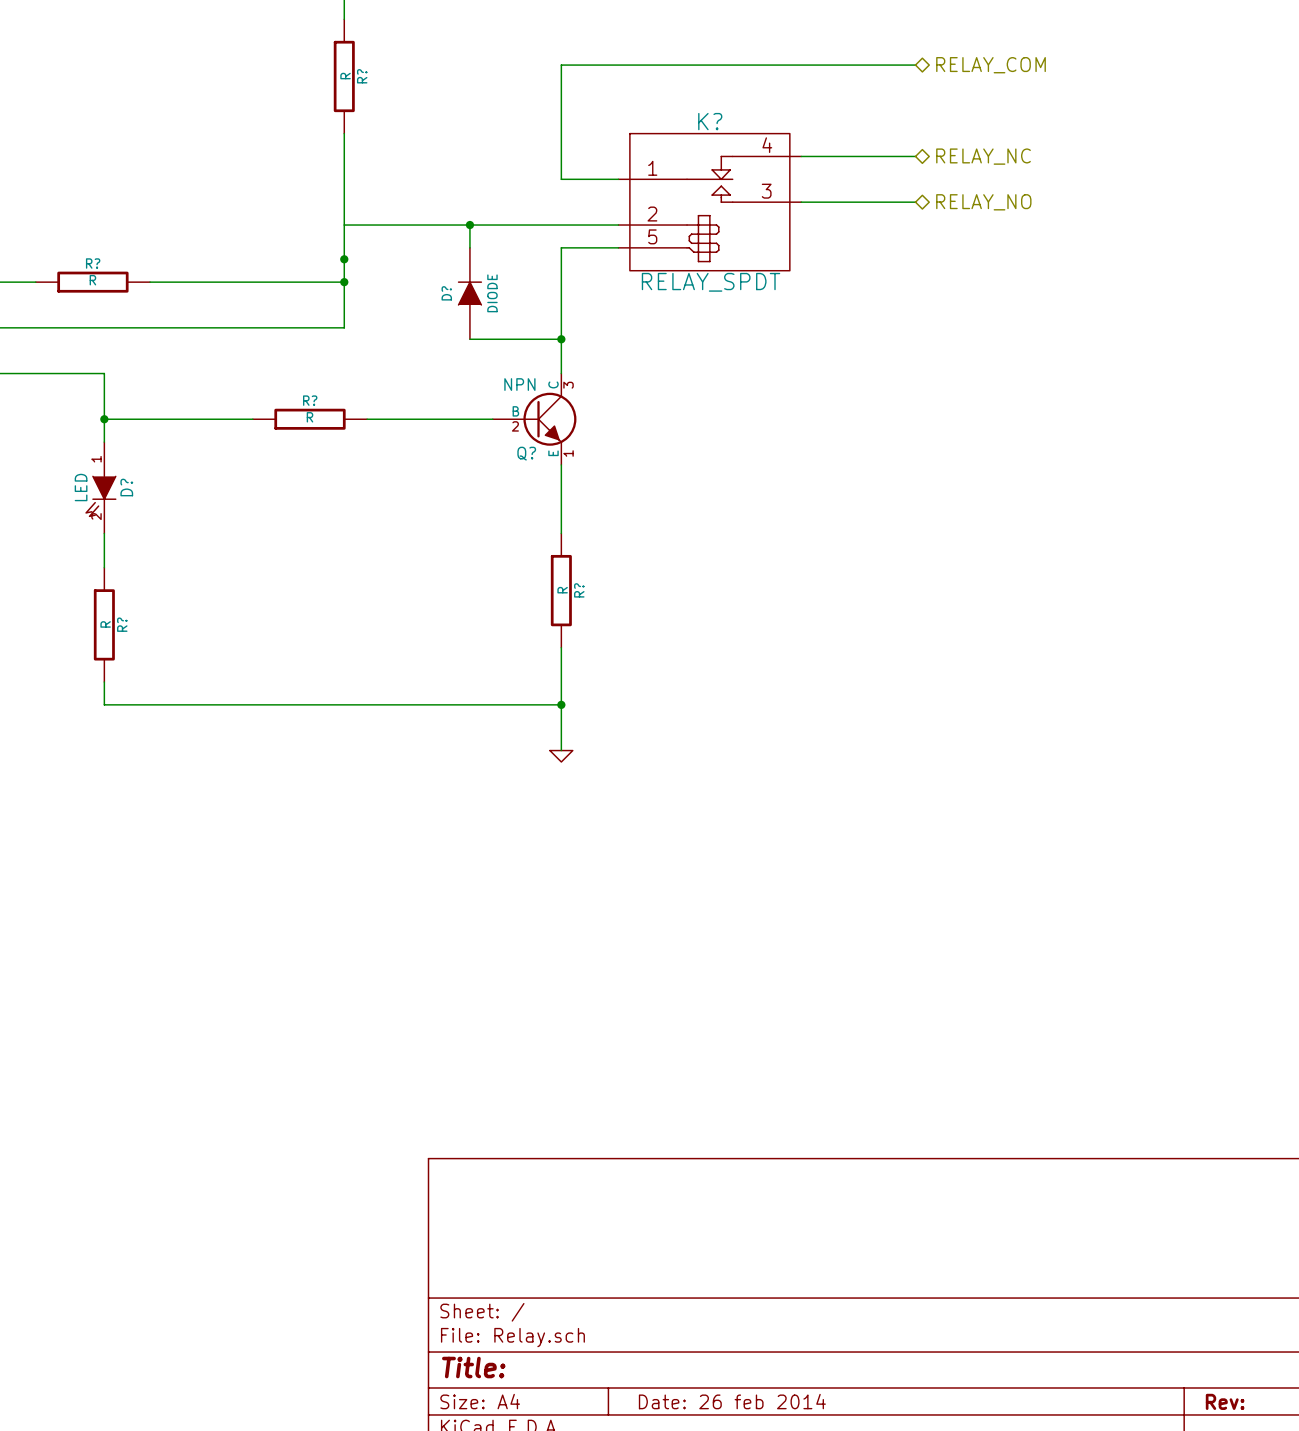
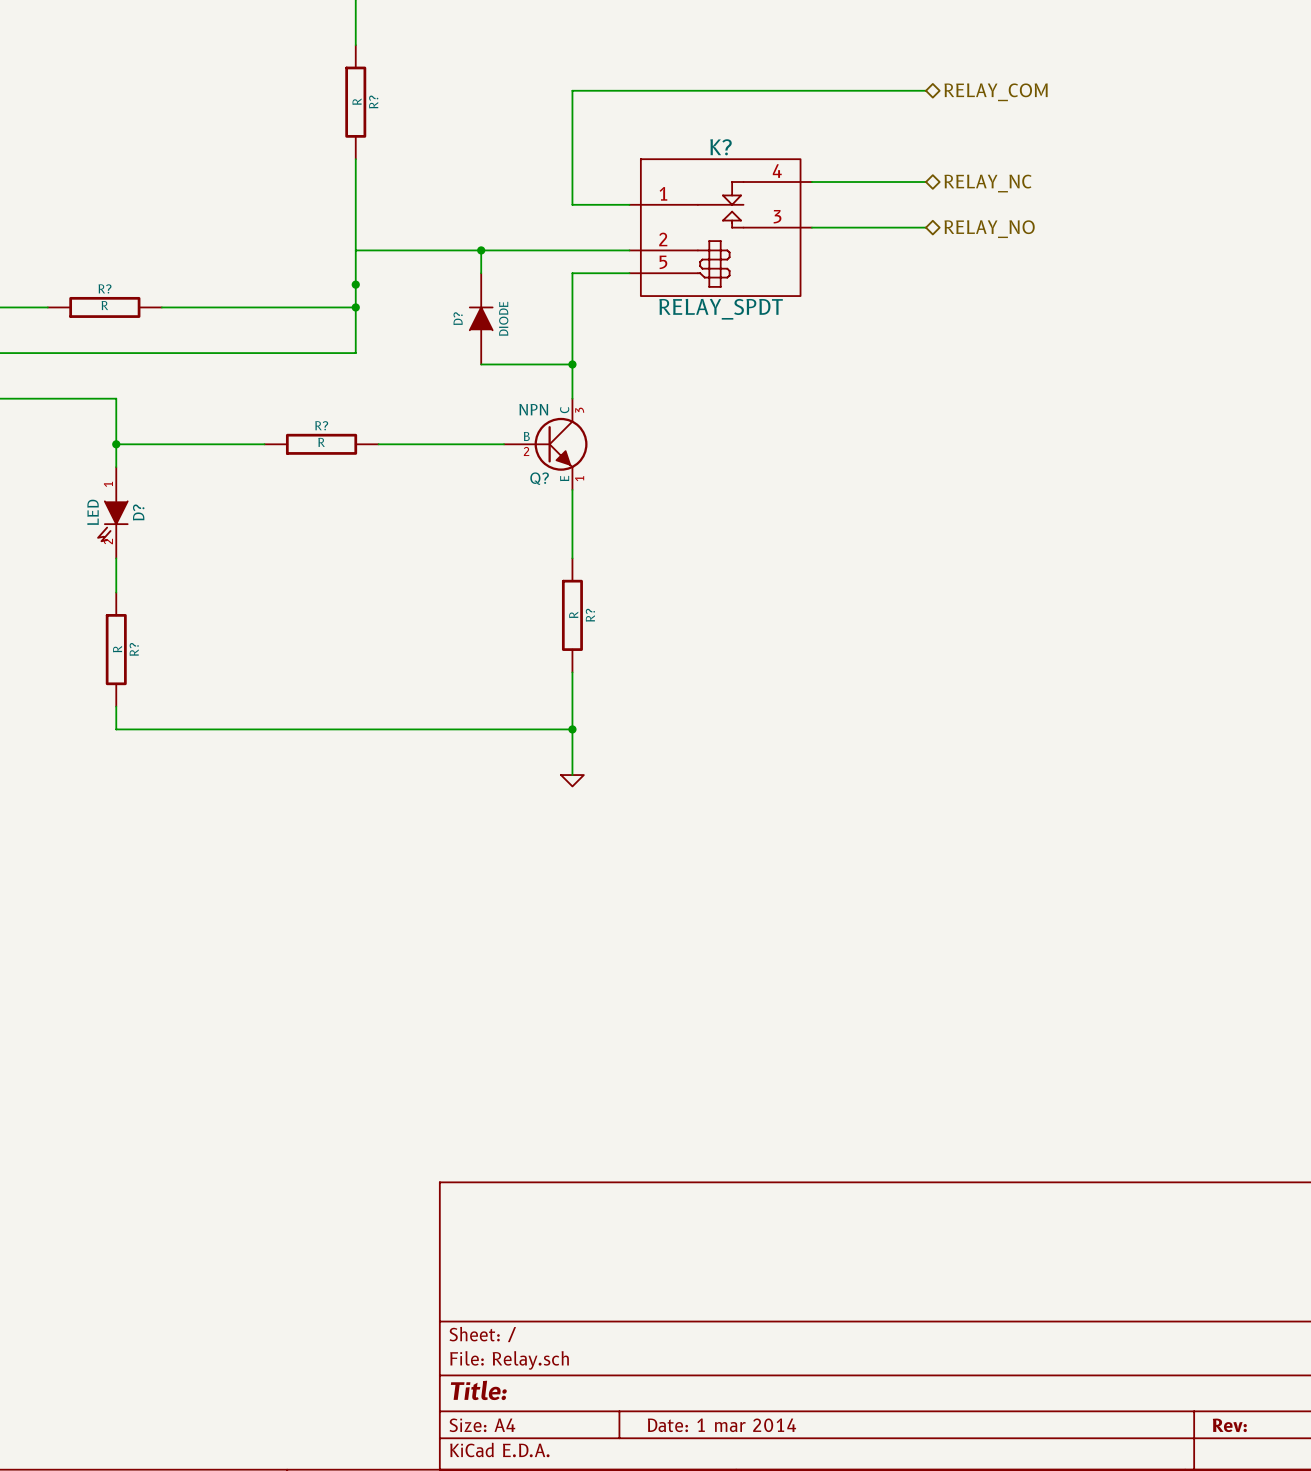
title block: Date: 26 feb 2014 (732, 1401) -> Date: 1 mar 2014 (722, 1425)

